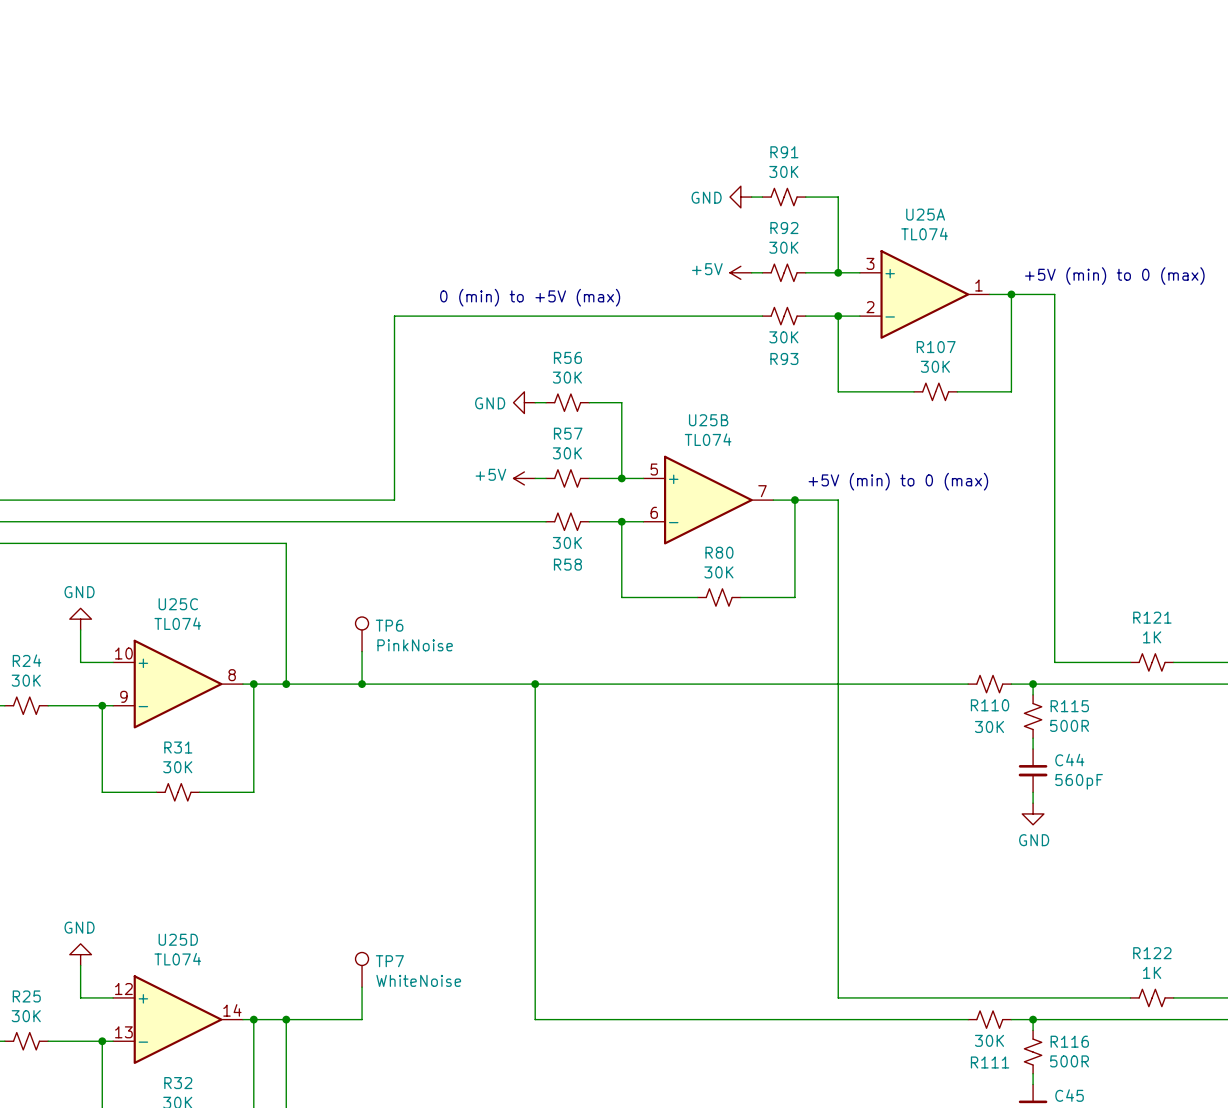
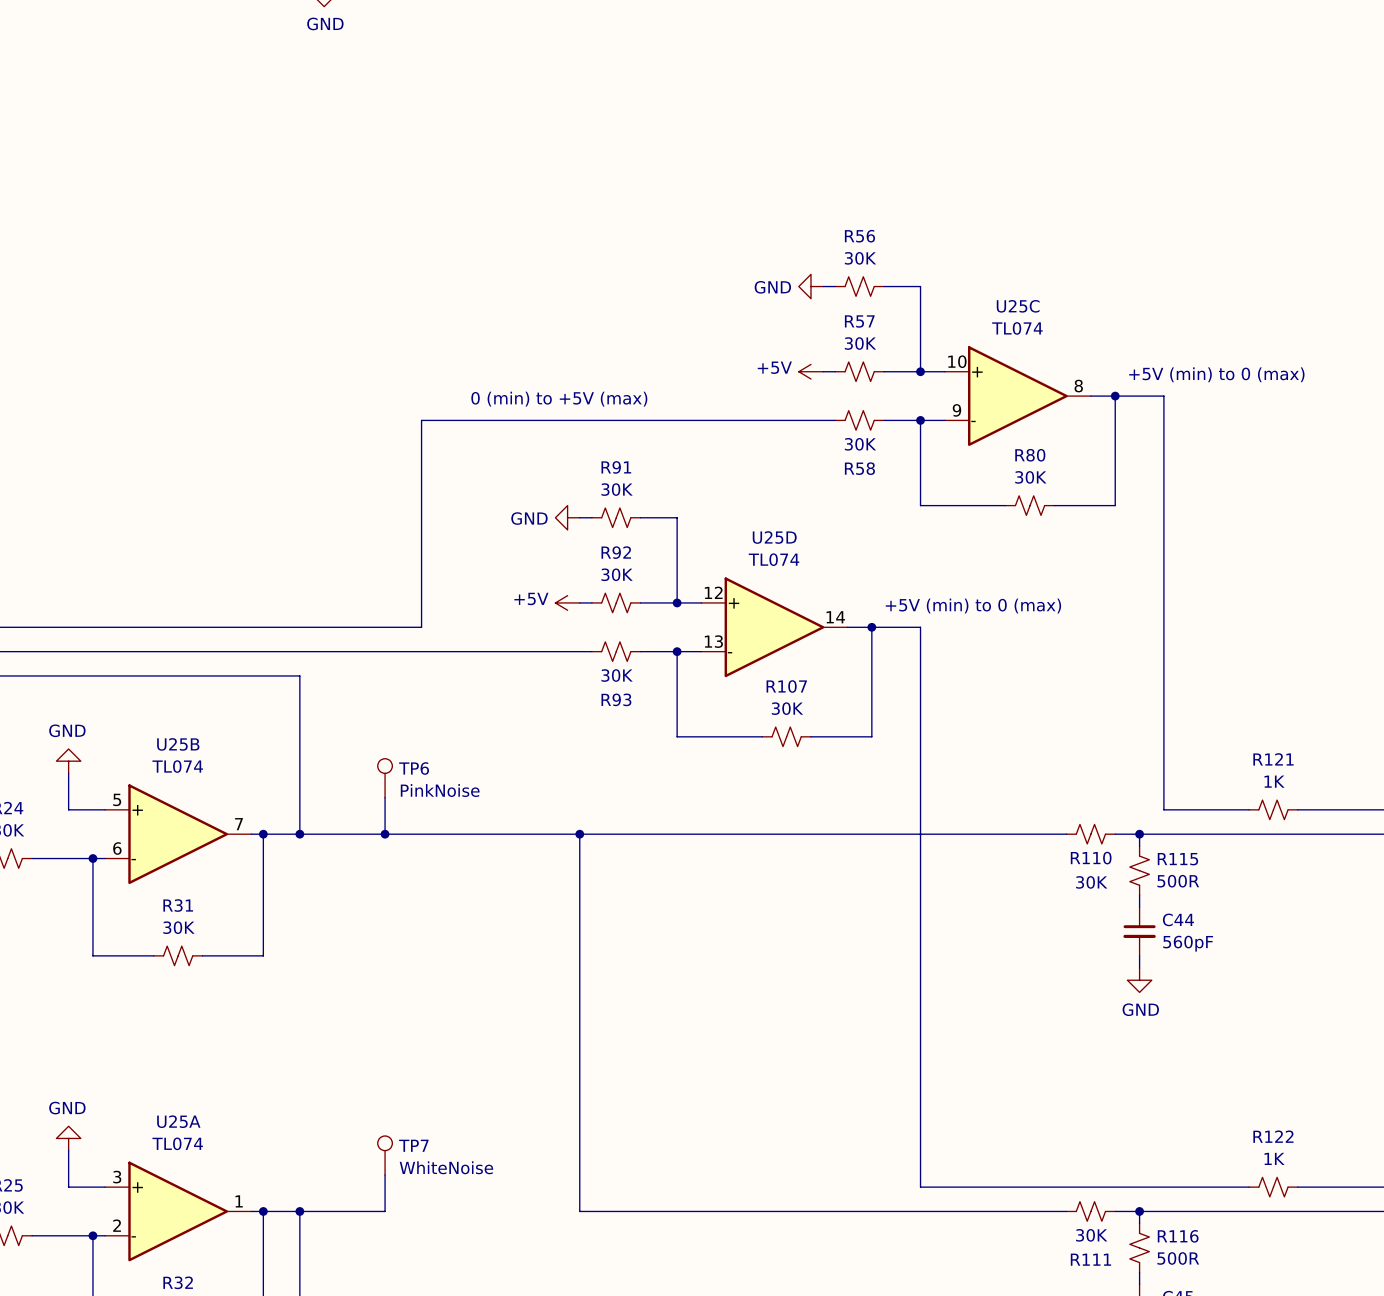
R91 name: R91 (784, 152) -> R56 (859, 236)
R92 name: R92 (784, 228) -> R57 (859, 321)
U25A position: (924, 294) -> (178, 1211)
R107 name: R107 (936, 347) -> R80 (1030, 455)
R56 name: R56 (567, 357) -> R91 (616, 467)
R93 name: R93 (784, 358) -> R58 (859, 468)
R57 name: R57 (568, 433) -> R92 (616, 552)
U25B position: (708, 500) -> (178, 834)
R80 name: R80 (719, 552) -> R107 (786, 686)
R58 name: R58 (567, 564) -> R93 (616, 699)
U25C position: (178, 684) -> (1017, 396)
U25D position: (178, 1019) -> (774, 627)

